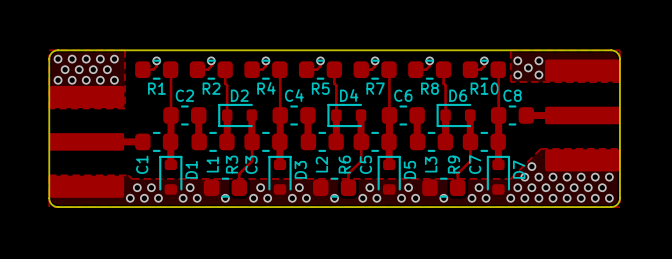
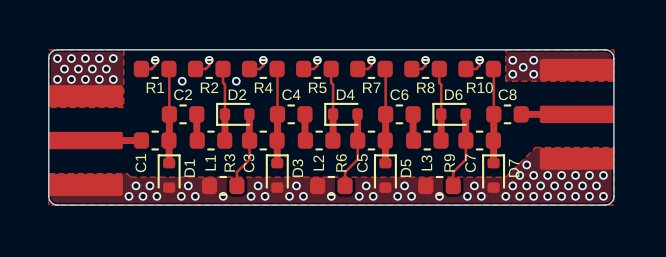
via: none -> (182, 81)
via: none -> (236, 81)

